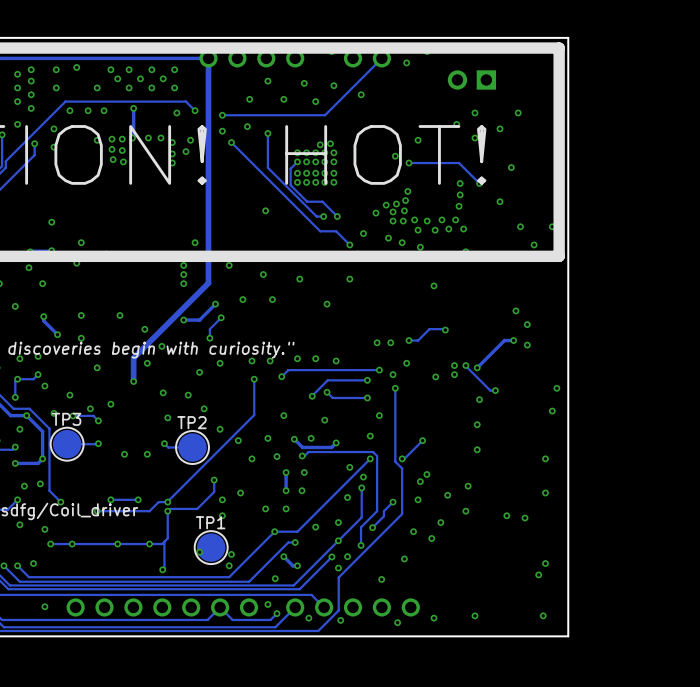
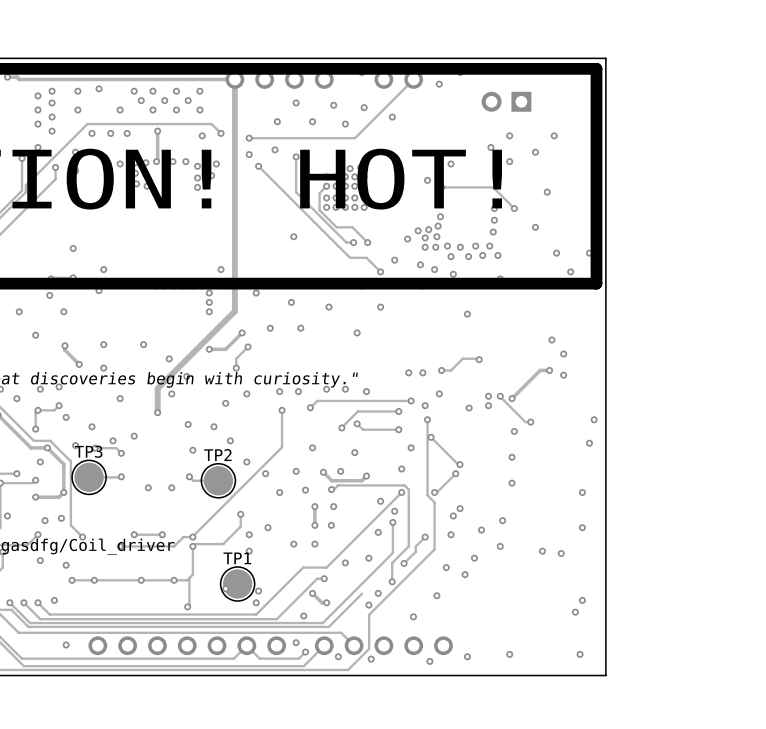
track: none -> (431, 437) (459, 464)
via: none -> (431, 437)
via: none -> (459, 464)
via: (274, 531) -> none
via: (338, 540) -> none
via: (331, 556) -> none

